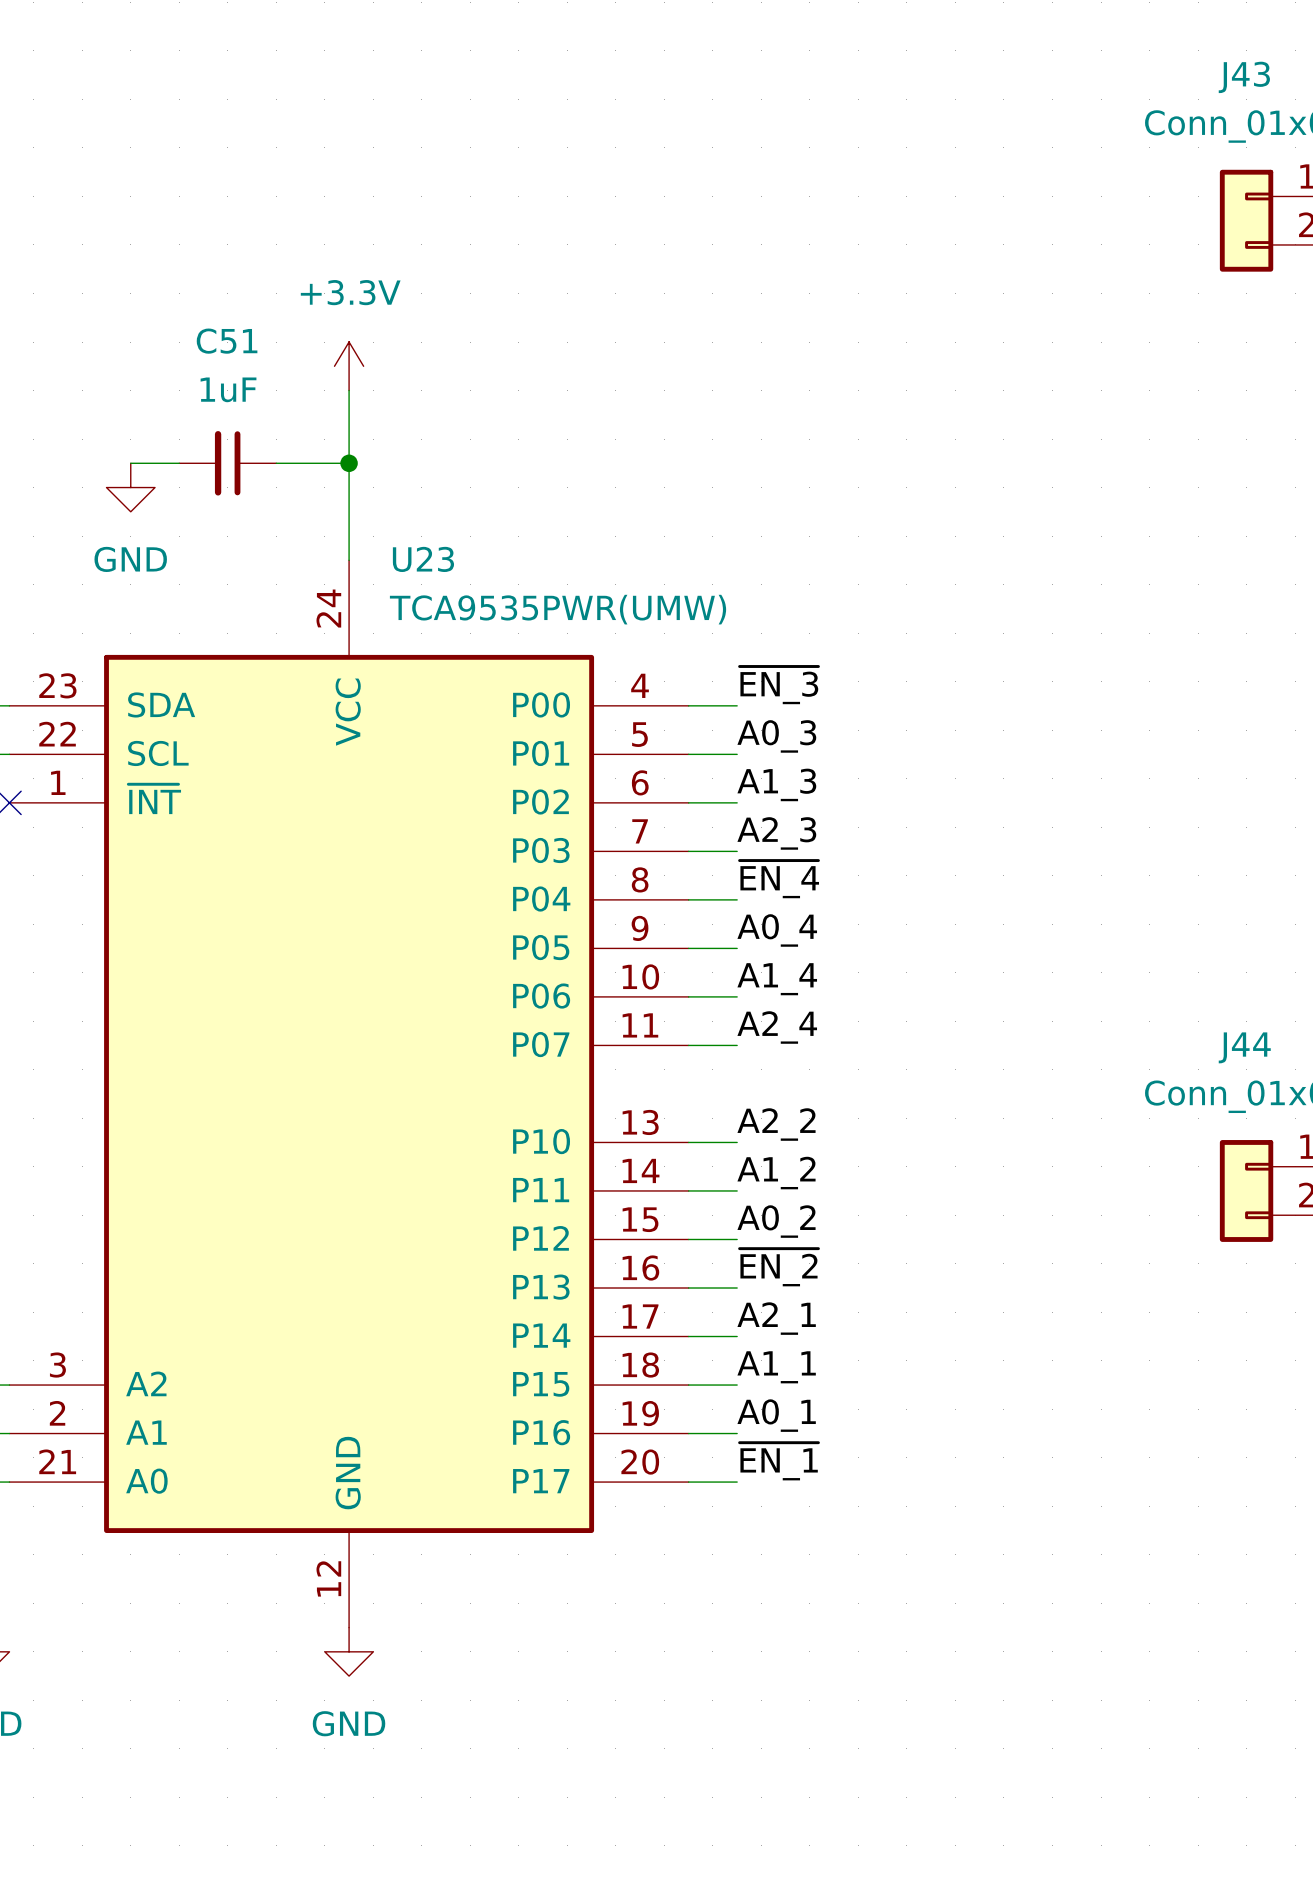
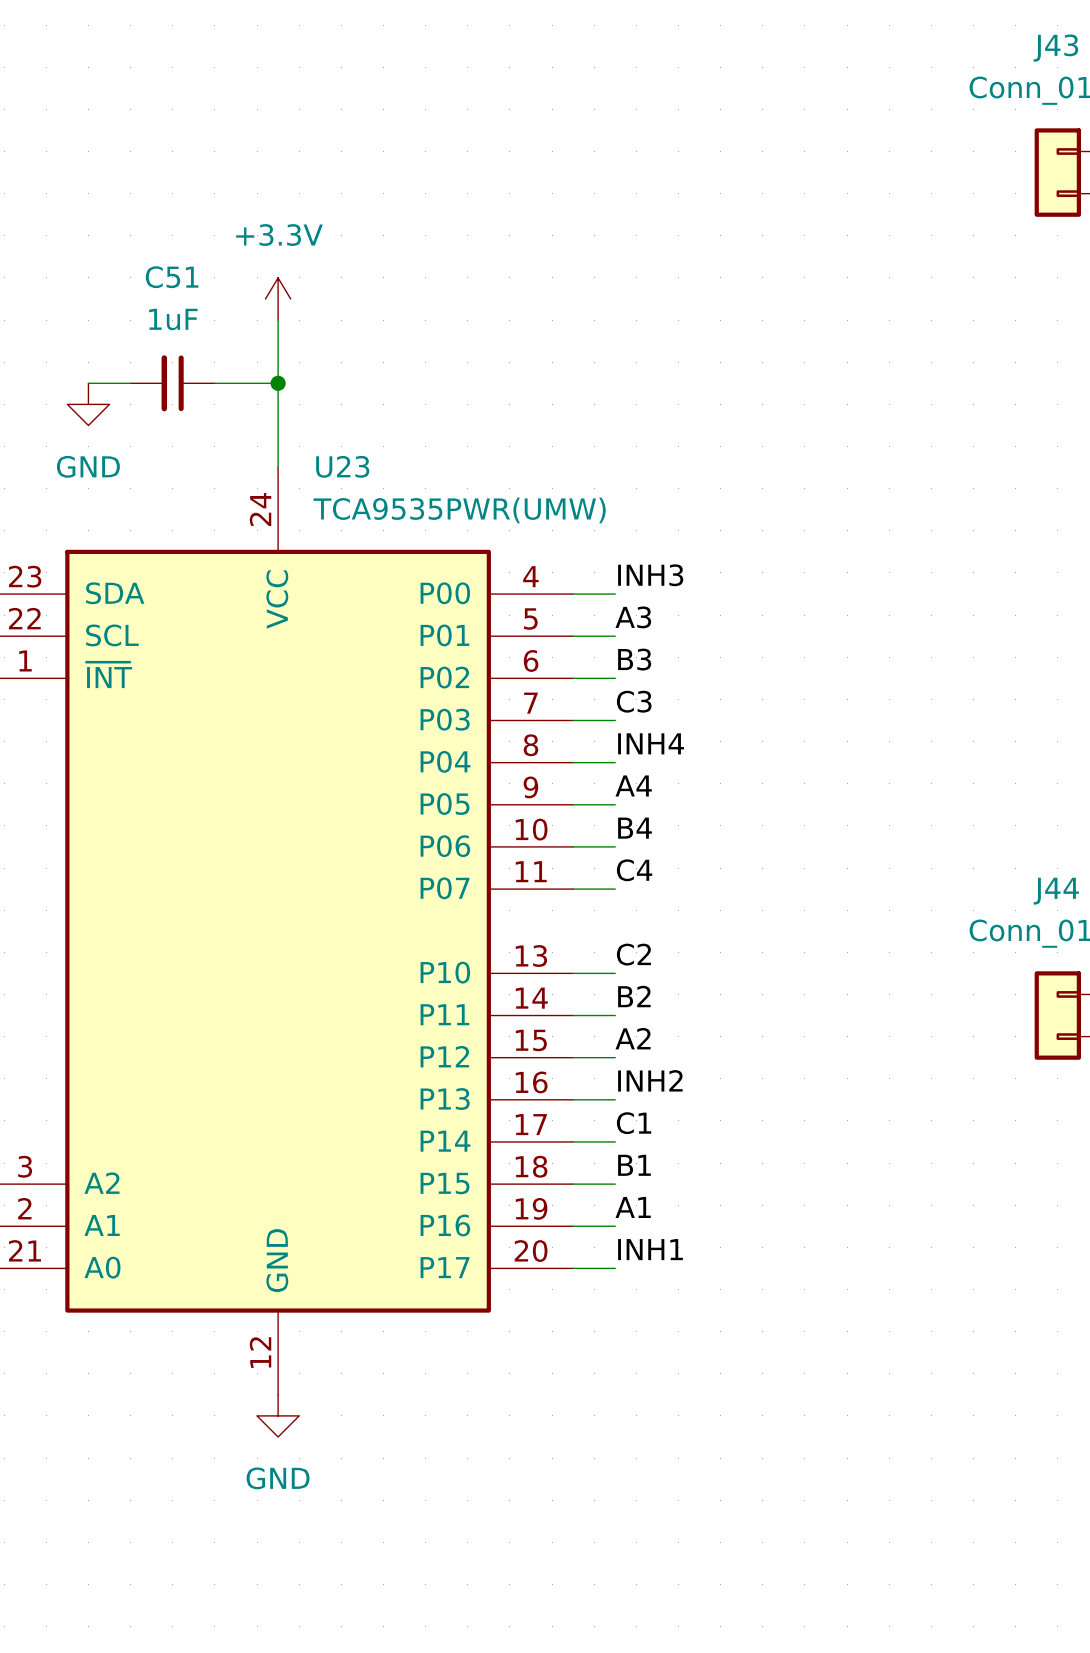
label: ~{EN_3} (779, 685) -> INH3 (650, 575)
label: A0_3 (776, 736) -> A3 (633, 617)
label: A1_3 (776, 784) -> B3 (634, 659)
label: A2_3 (776, 833) -> C3 (634, 701)
label: ~{EN_4} (779, 879) -> INH4 (651, 743)
label: A0_4 (777, 930) -> A4 (633, 785)
label: A1_4 (777, 979) -> B4 (635, 828)
label: A2_4 (777, 1027) -> C4 (634, 870)
label: A2_2 (776, 1124) -> C2 (633, 954)
label: A1_2 (776, 1173) -> B2 (634, 996)
label: A0_2 (776, 1221) -> A2 (633, 1038)
label: ~{EN_2} (779, 1267) -> INH2 (650, 1080)
label: A2_1 (776, 1318) -> C1 (634, 1123)
label: A1_1 (776, 1367) -> B1 (634, 1165)
label: A0_1 (776, 1415) -> A1 (633, 1207)
label: ~{EN_1} (779, 1461) -> INH1 (650, 1249)

